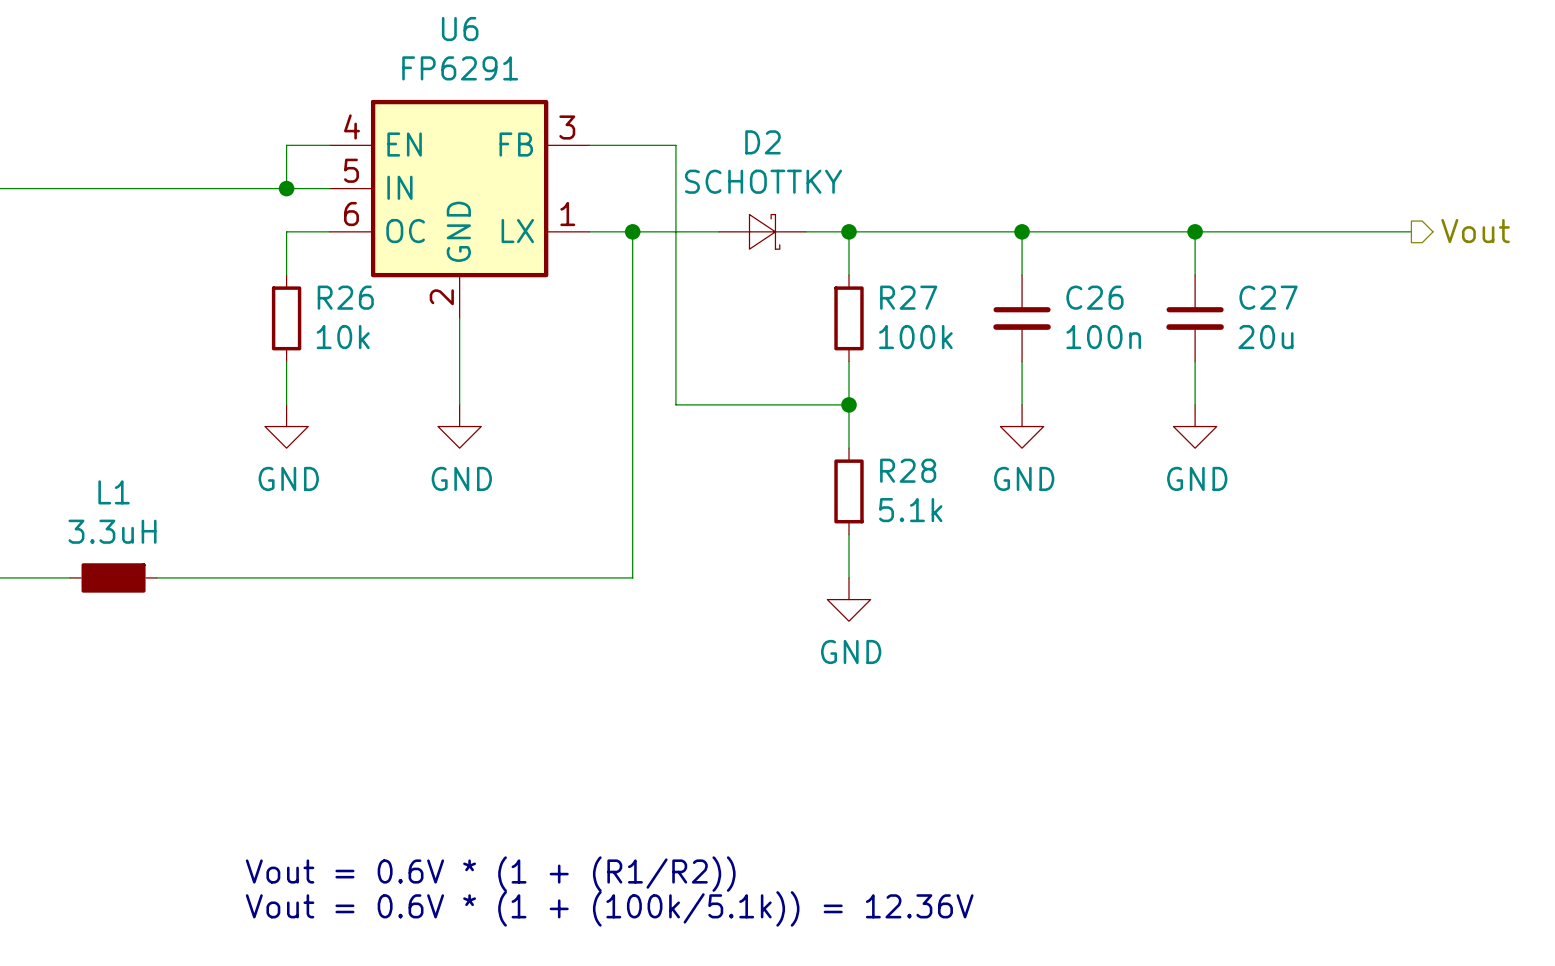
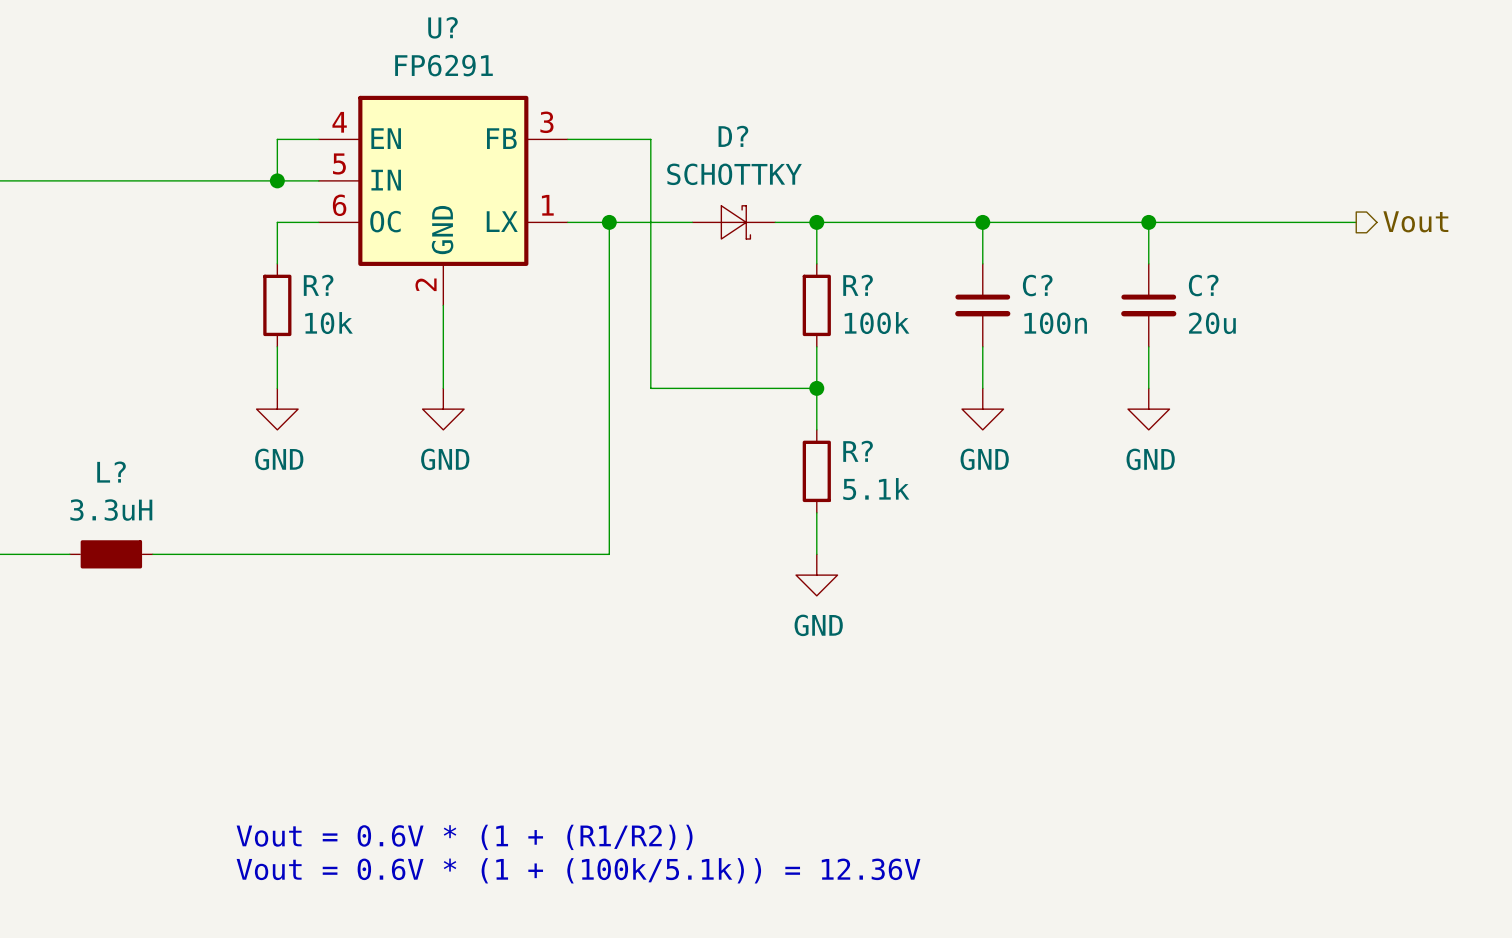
U6 name: U6 (460, 29) -> U? (443, 27)
D2 name: D2 (762, 142) -> D? (733, 136)
R26 name: R26 (345, 297) -> R? (318, 285)
R27 name: R27 (908, 297) -> R? (858, 285)
C26 name: C26 (1094, 297) -> C? (1037, 285)
C27 name: C27 (1268, 297) -> C? (1203, 285)
R28 name: R28 (908, 470) -> R? (858, 451)
L1 name: L1 (114, 492) -> L? (111, 472)

